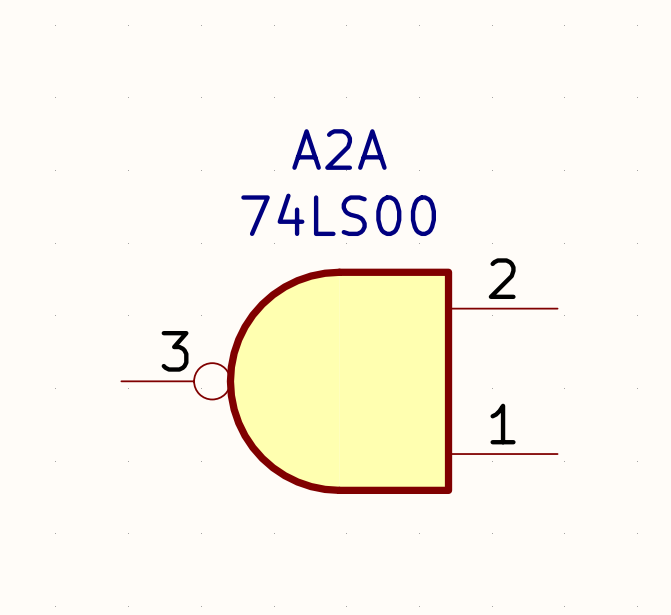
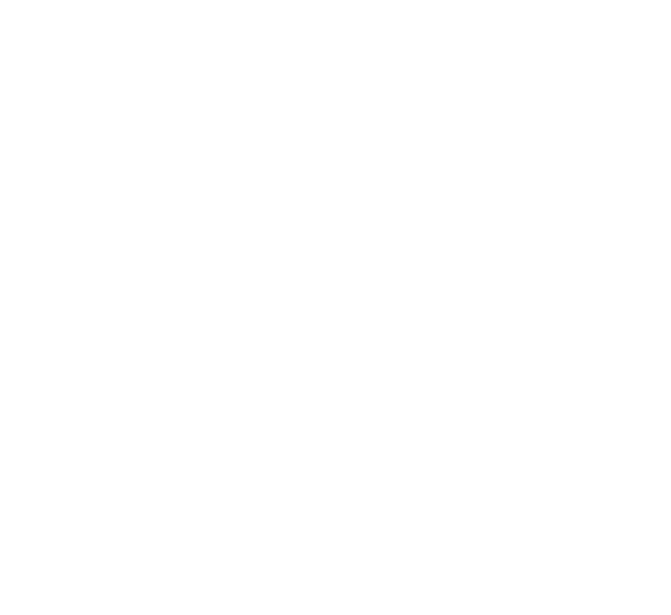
A2A: 74LS00 (339, 381) -> none

